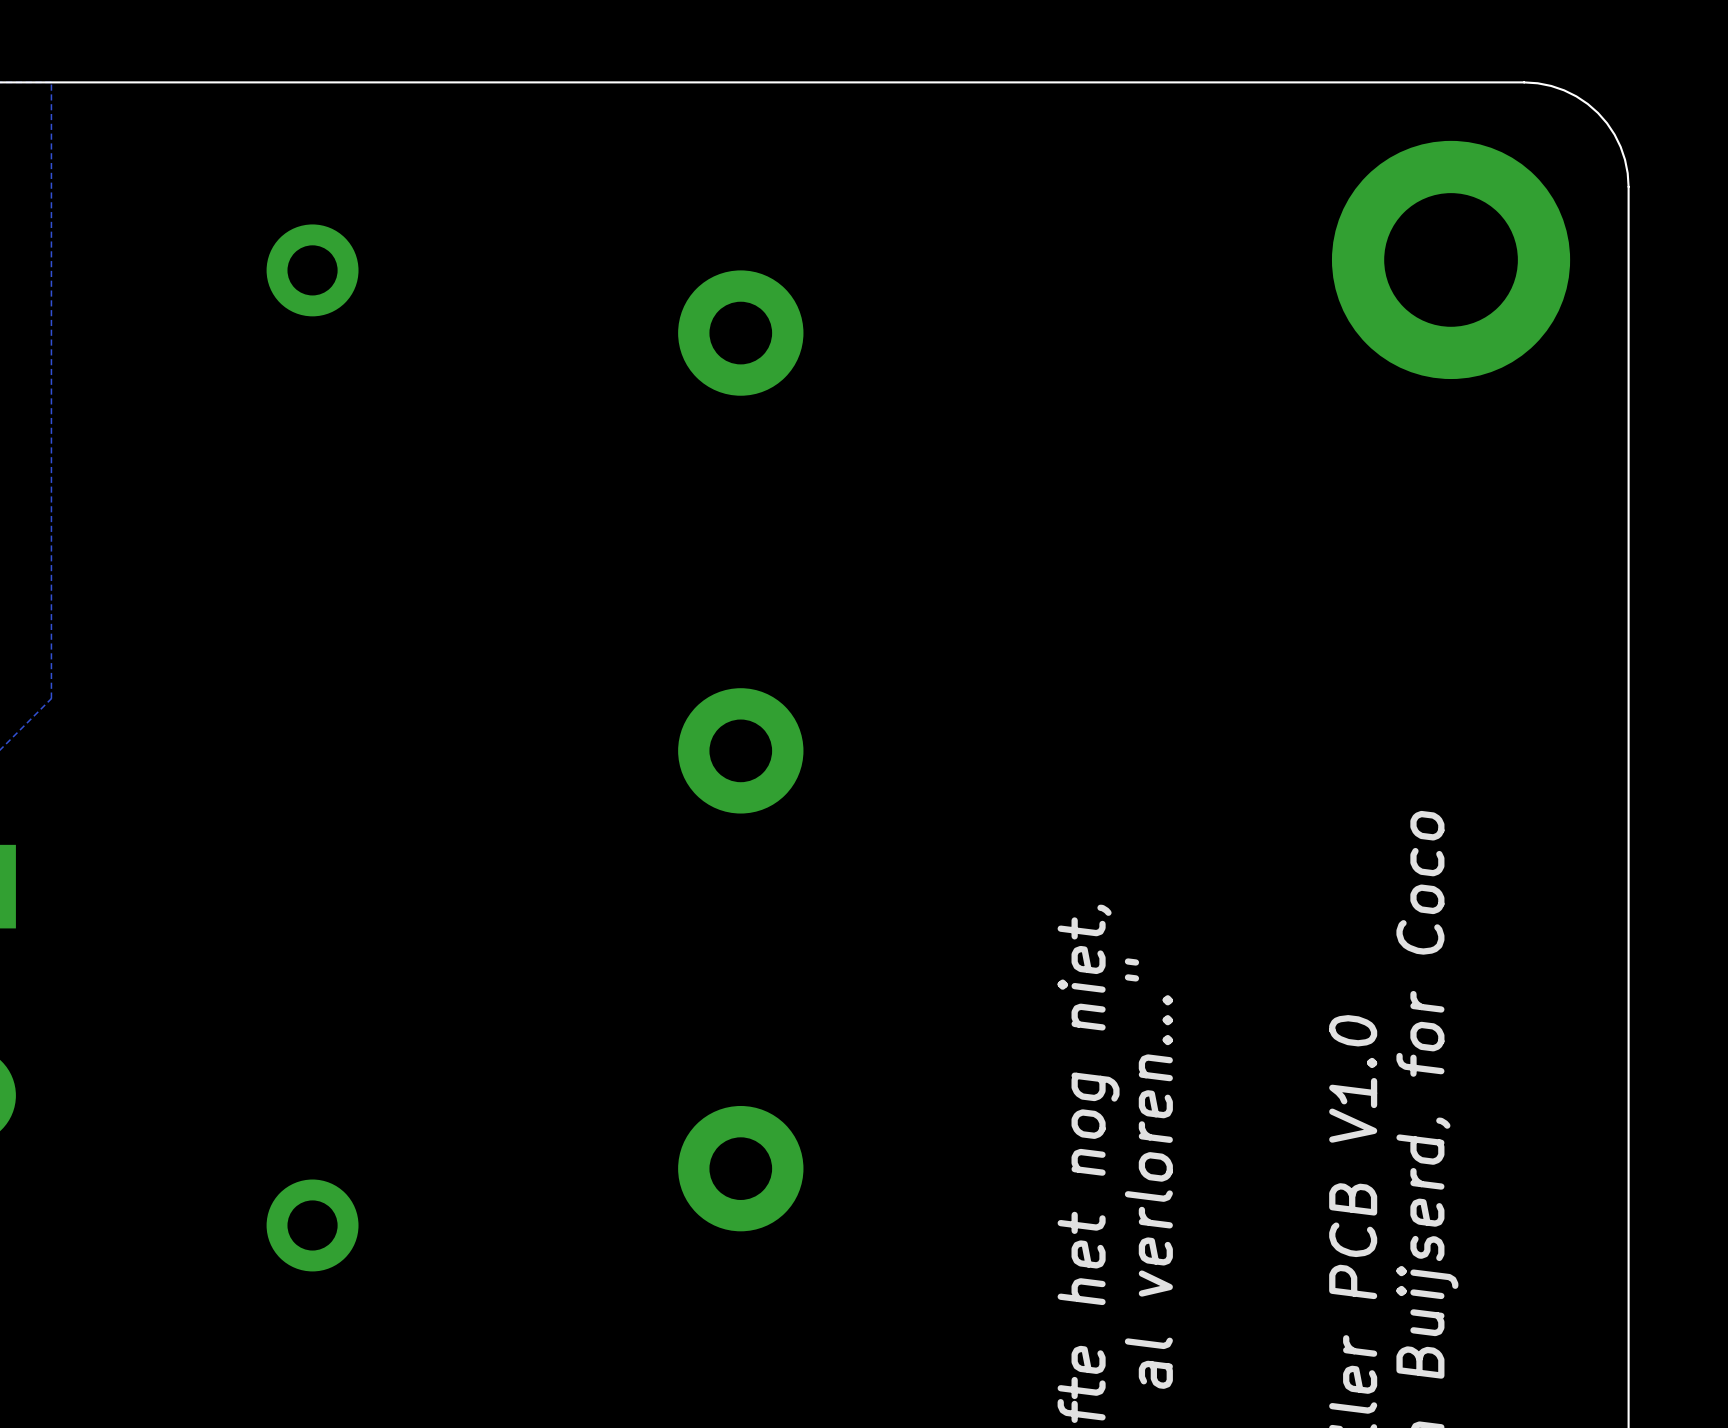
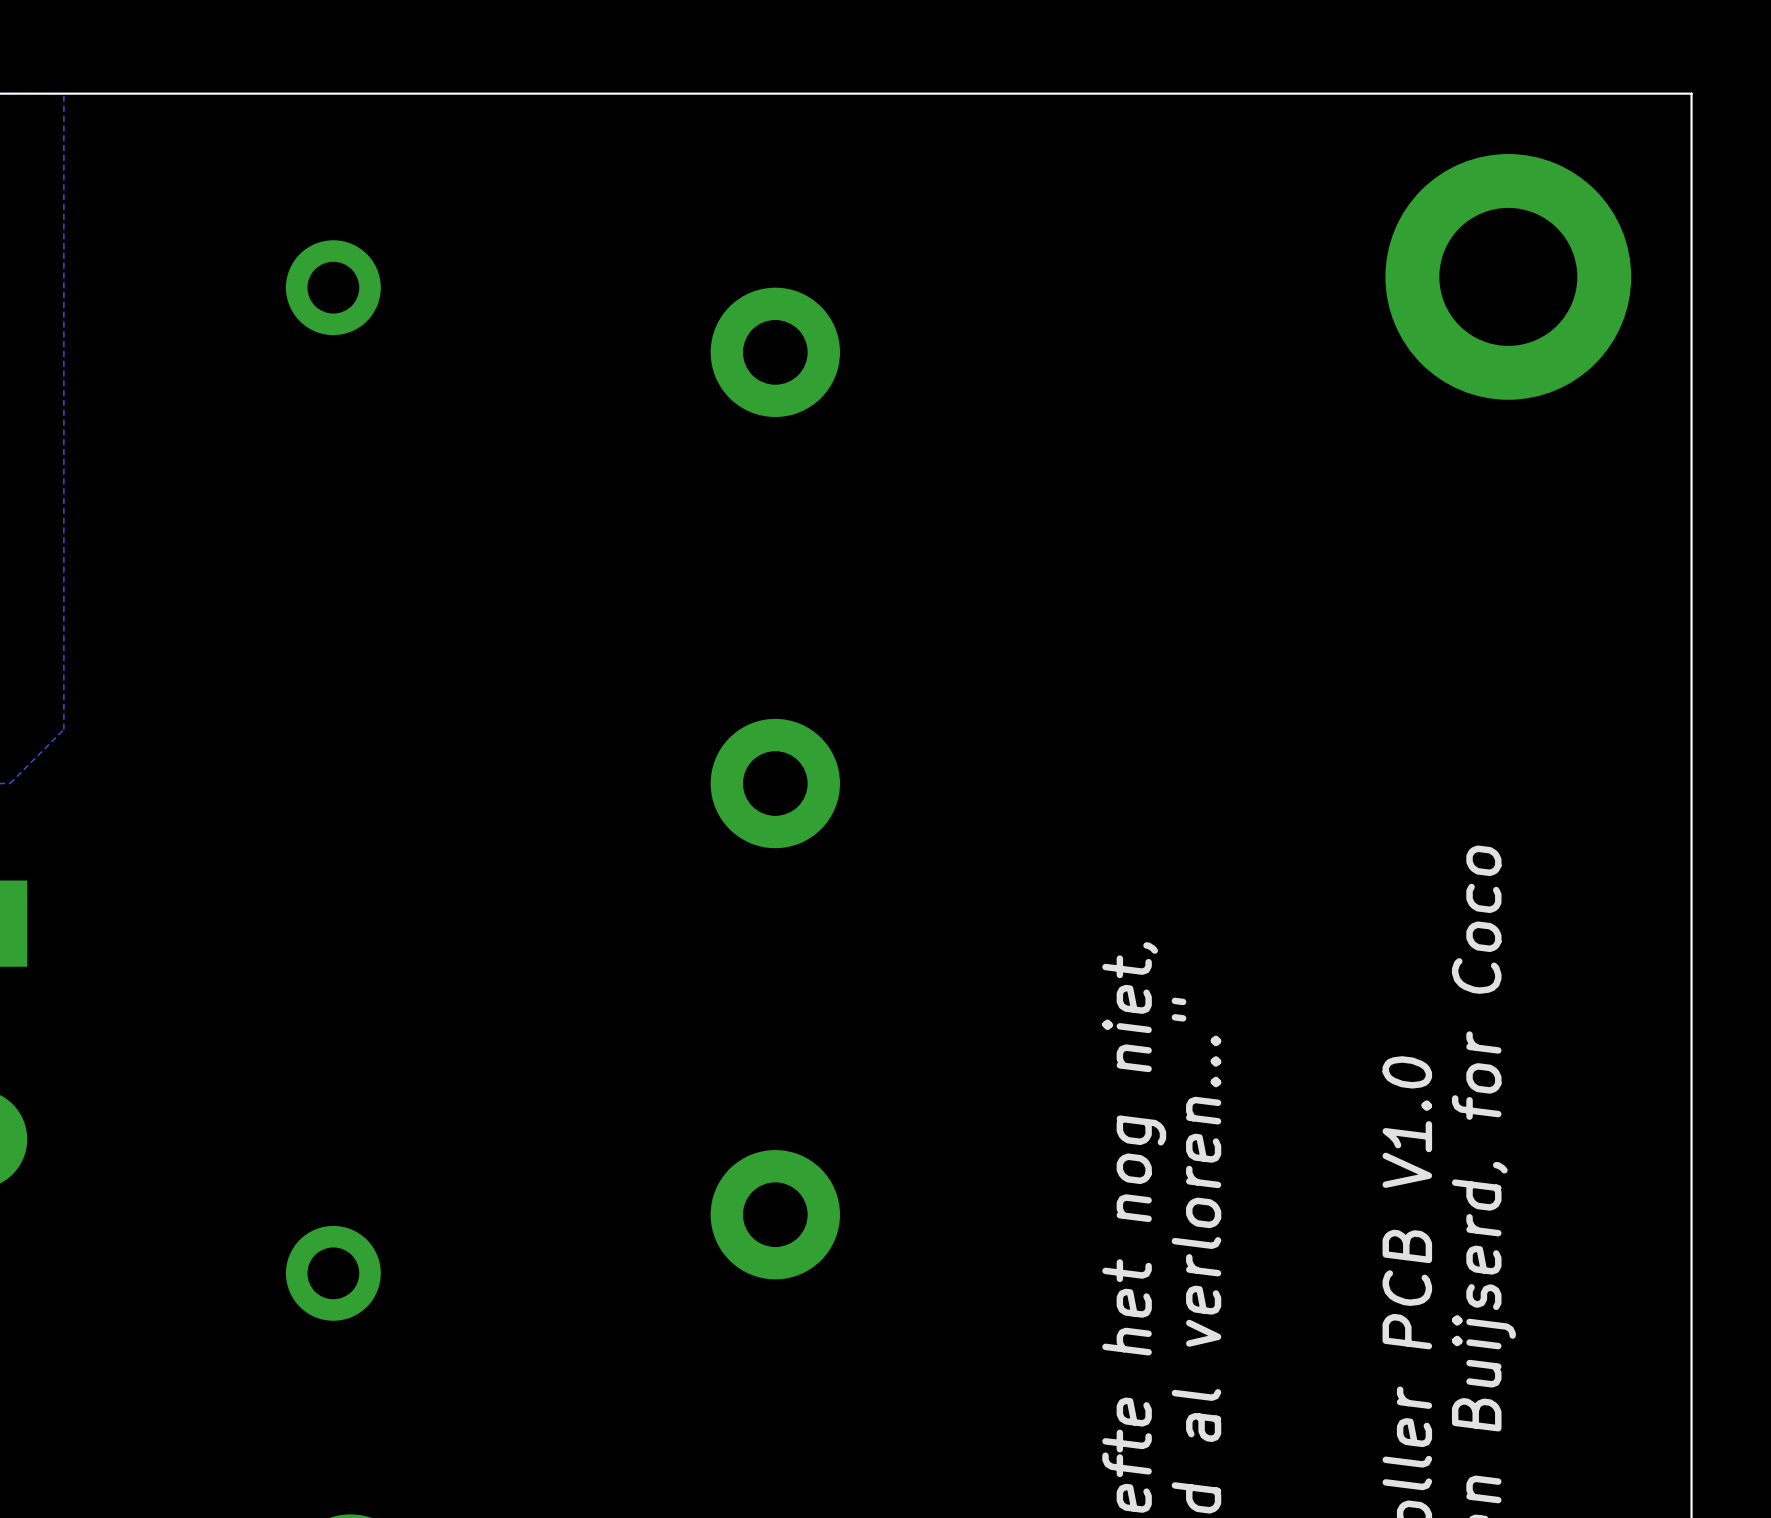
board edge: (1524, 82) (1537, 83) (1564, 90) (1587, 103) (1598, 112) (1607, 123) (1620, 146) (1627, 173) (1628, 186) -> (1583, 93) (1691, 93) (1691, 201)

